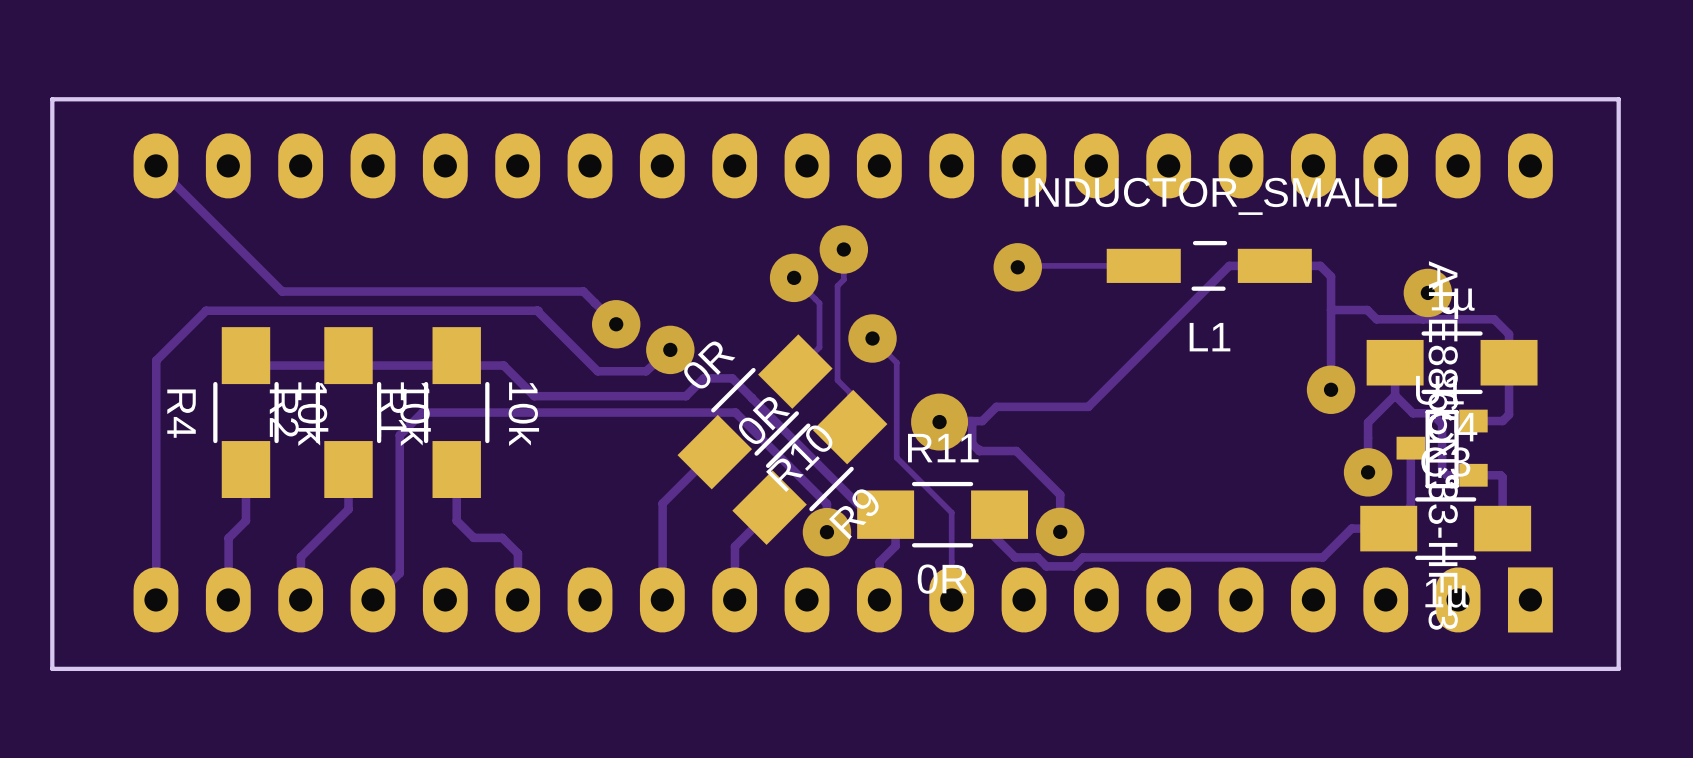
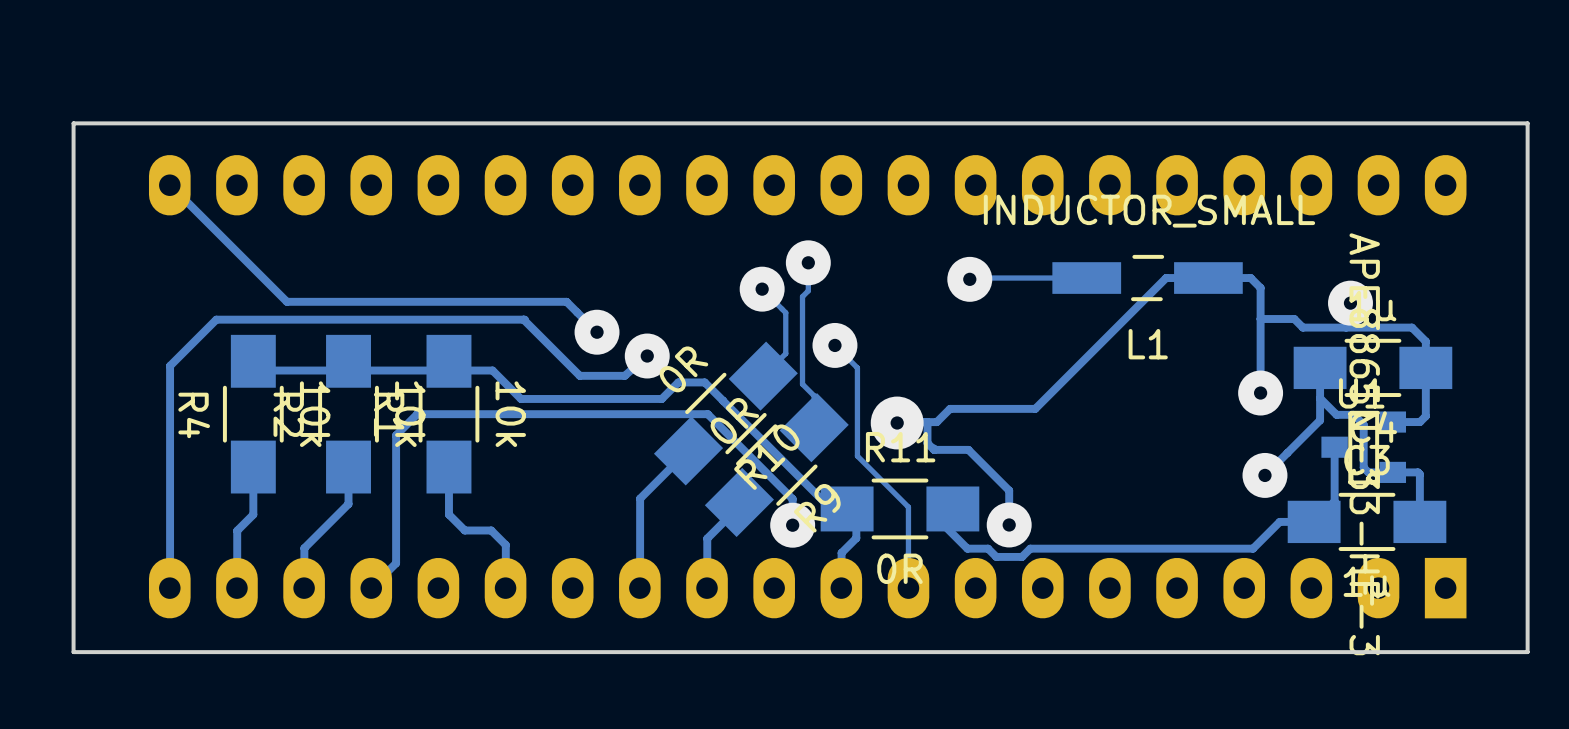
track: (1395, 395) (1368, 422) (1368, 472) -> (1320, 398) (1320, 420) (1264, 475)
via position: (1368, 472) -> (1264, 475)

